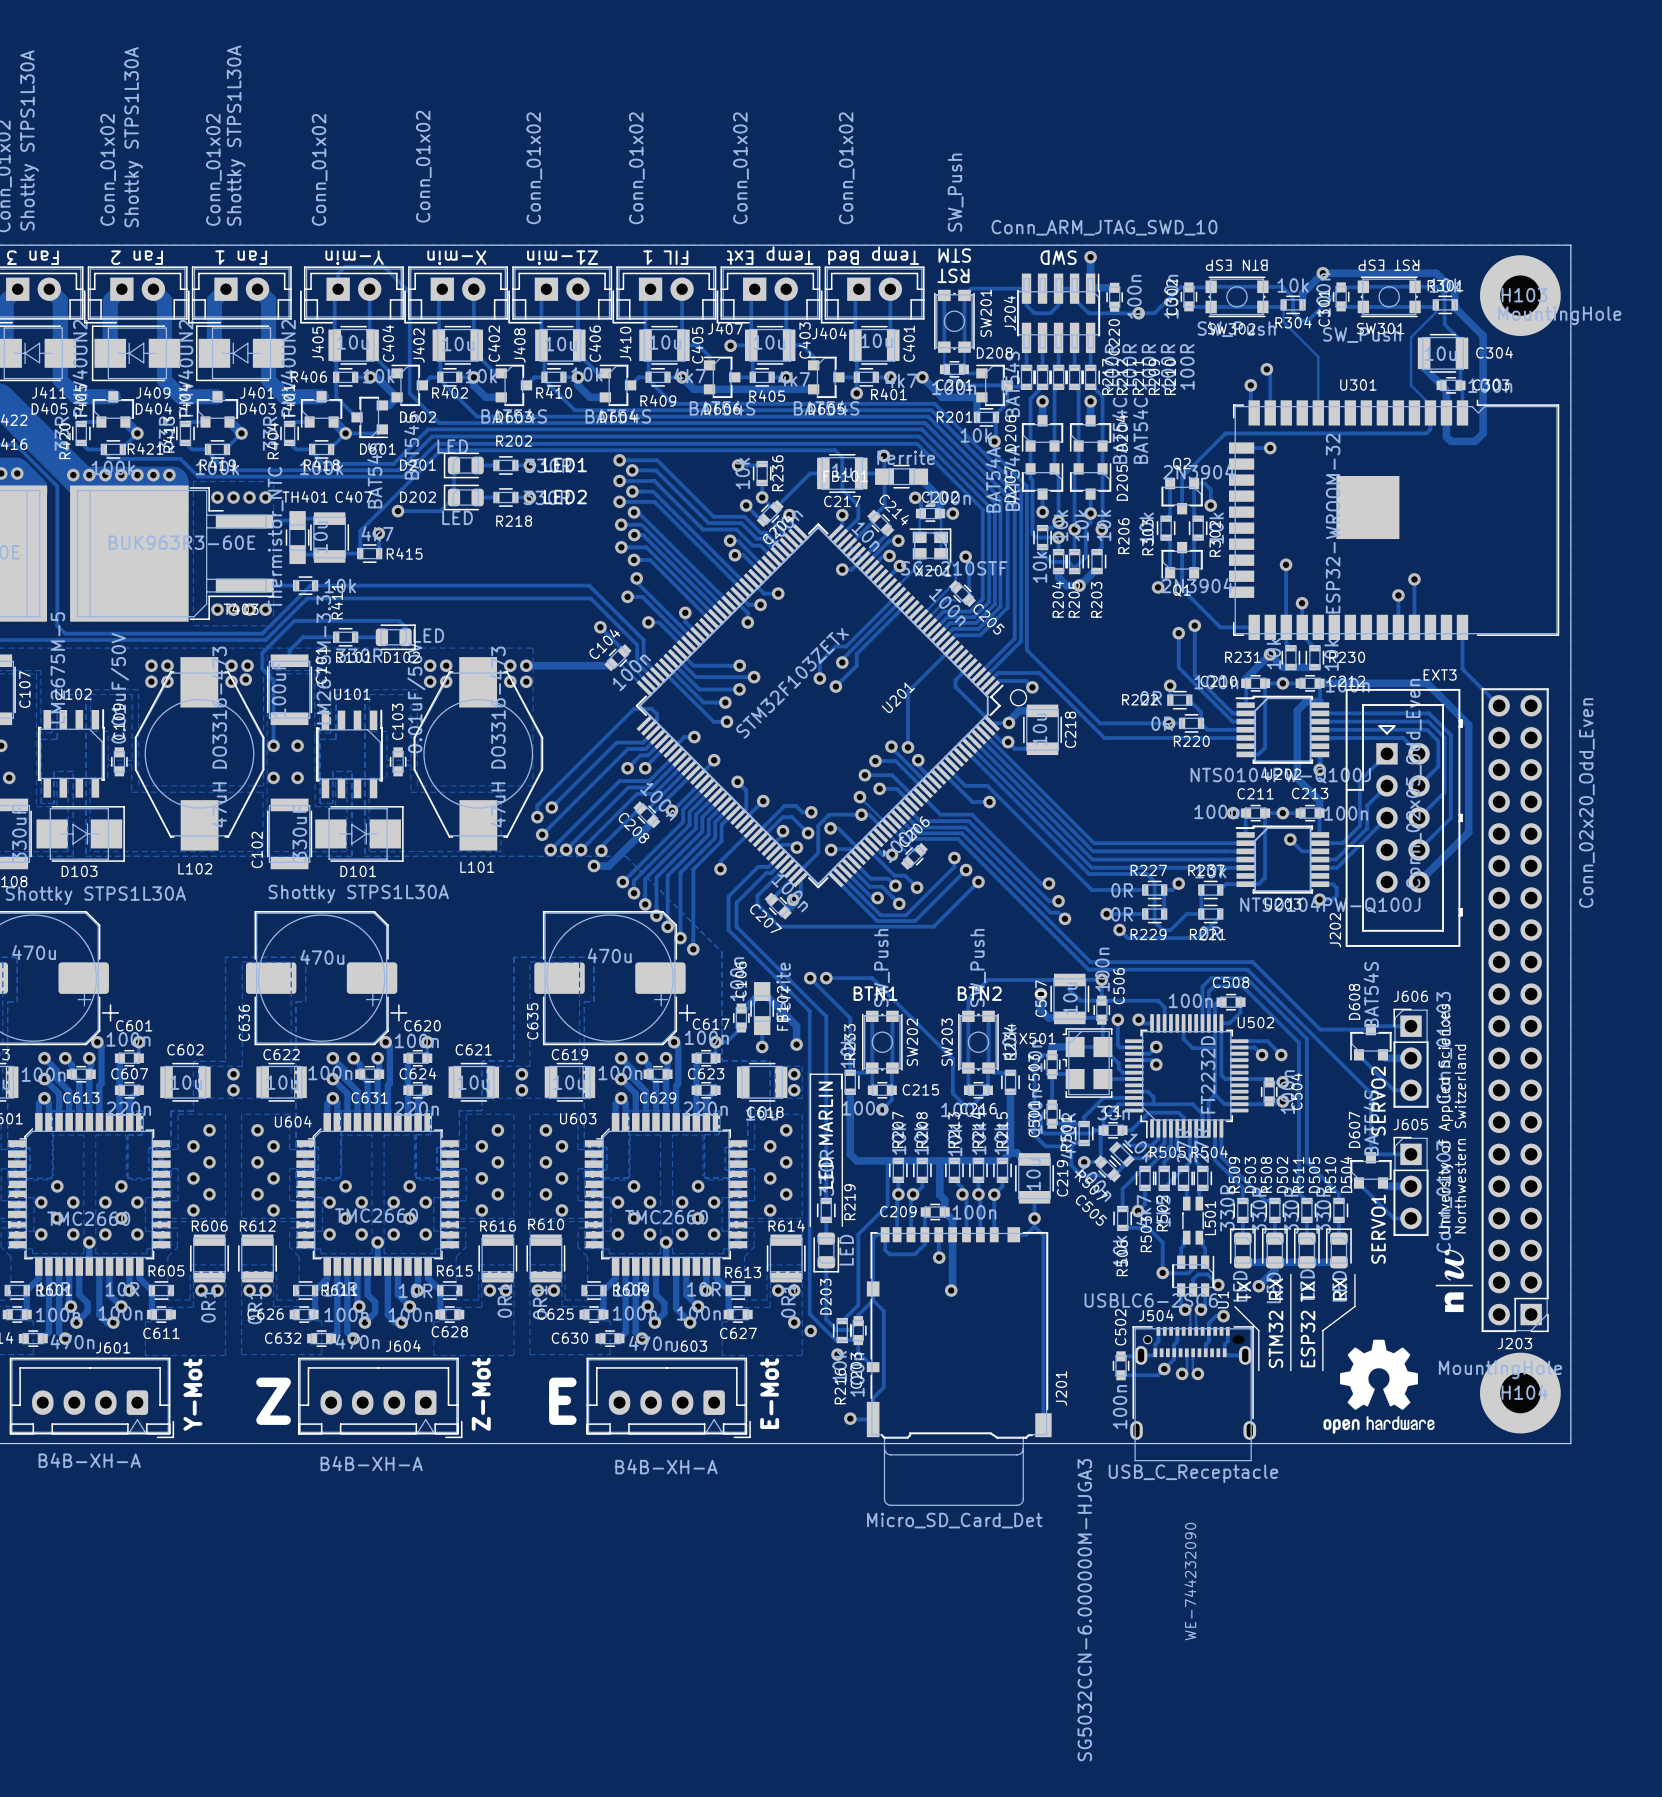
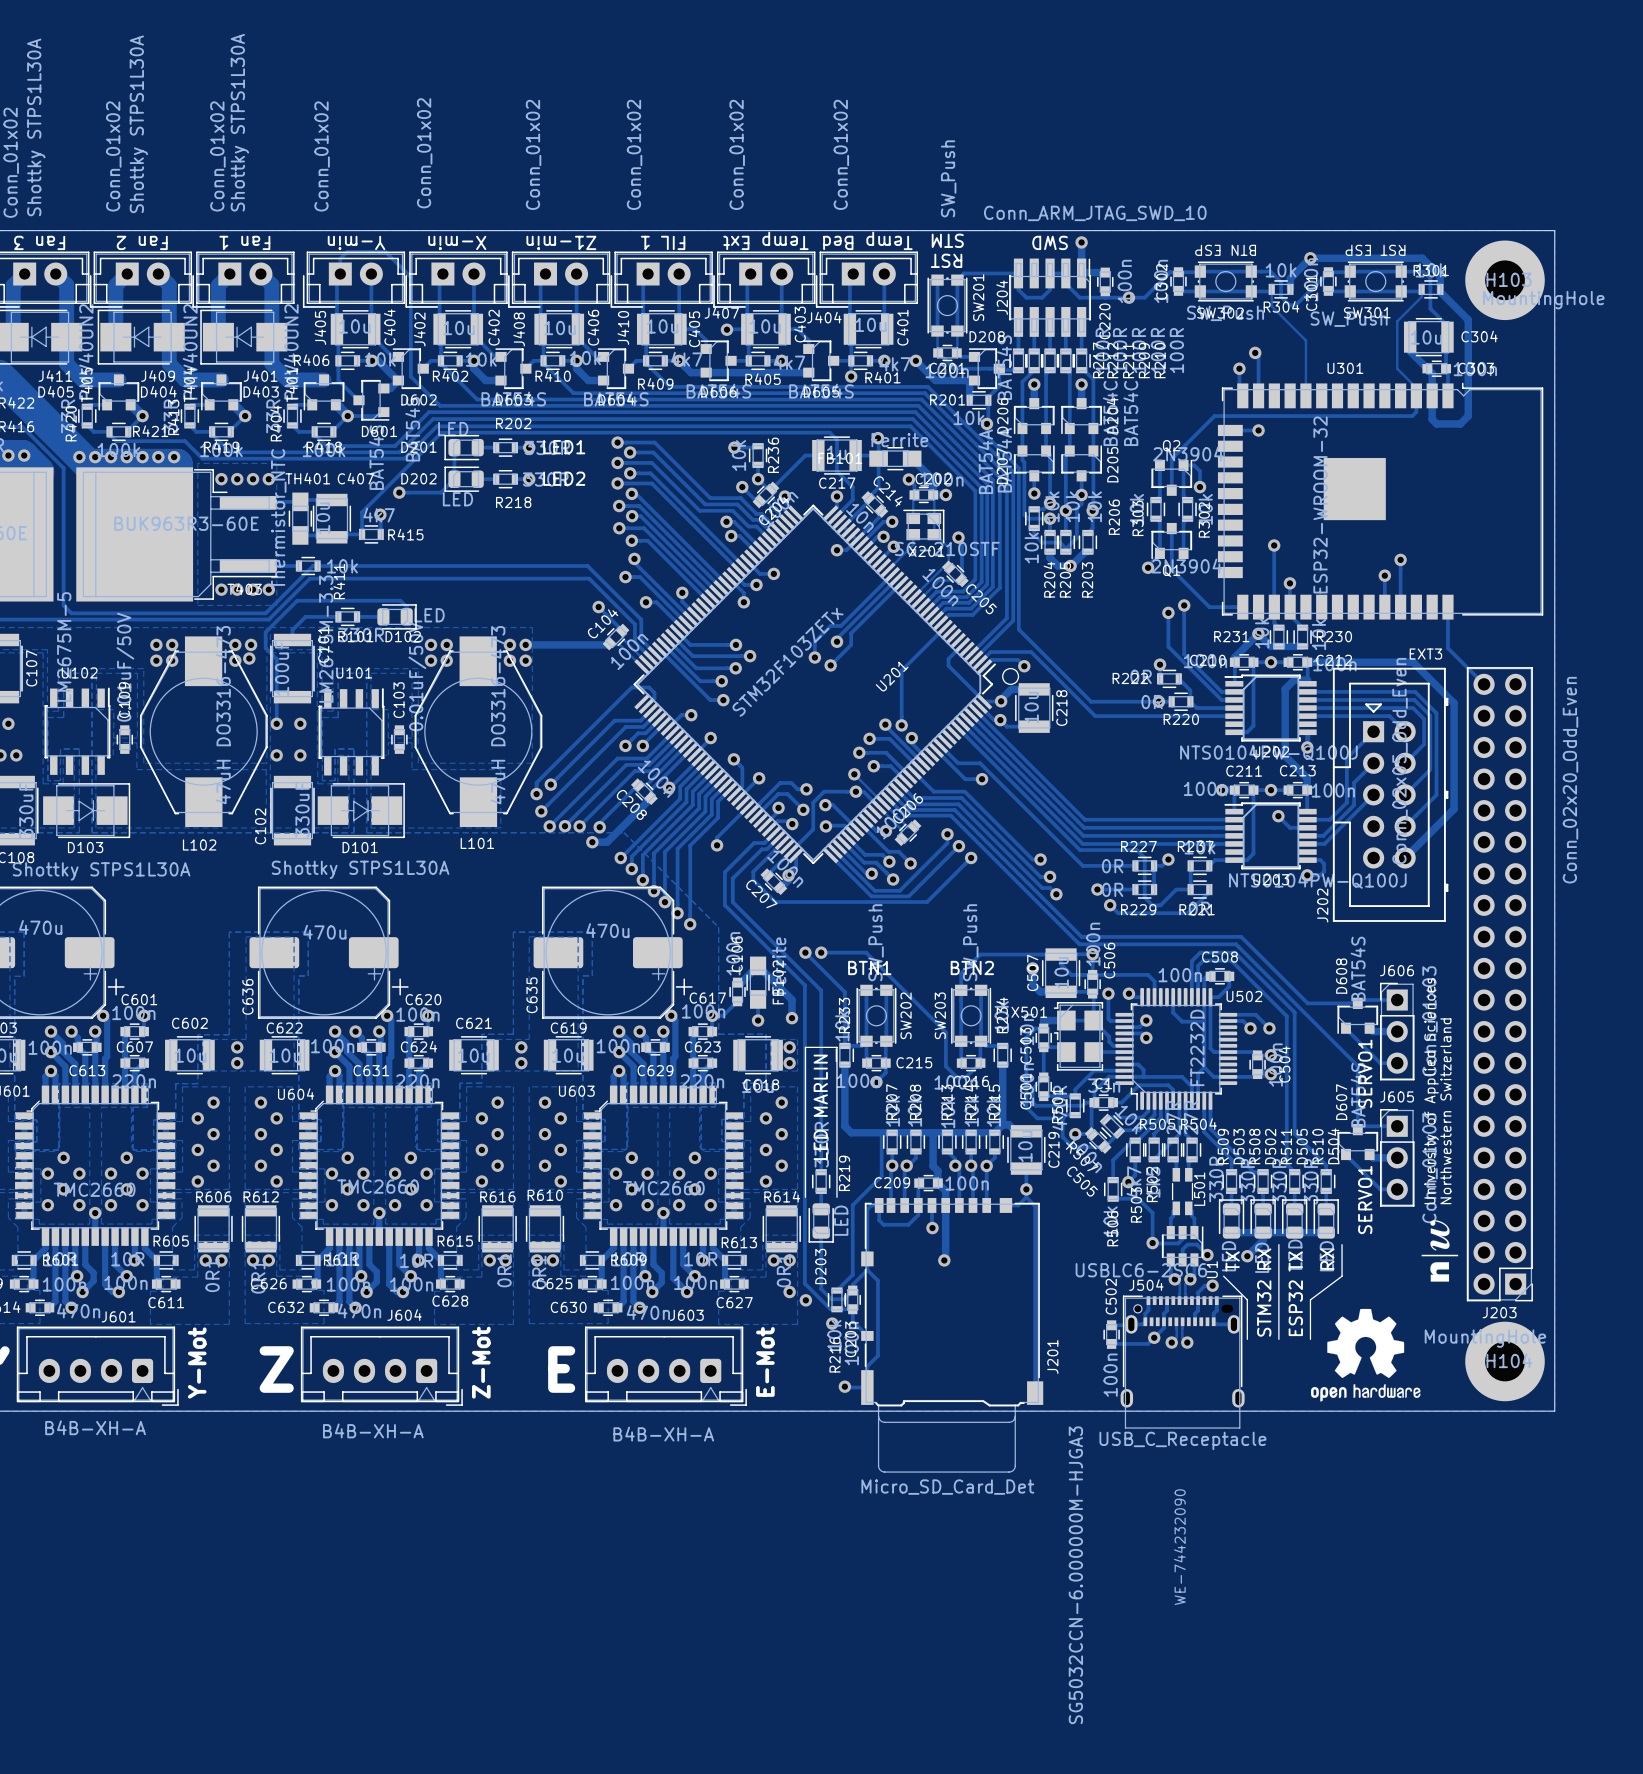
text: SERVO2 (1378, 1101) -> SERVO1 (1365, 1073)

